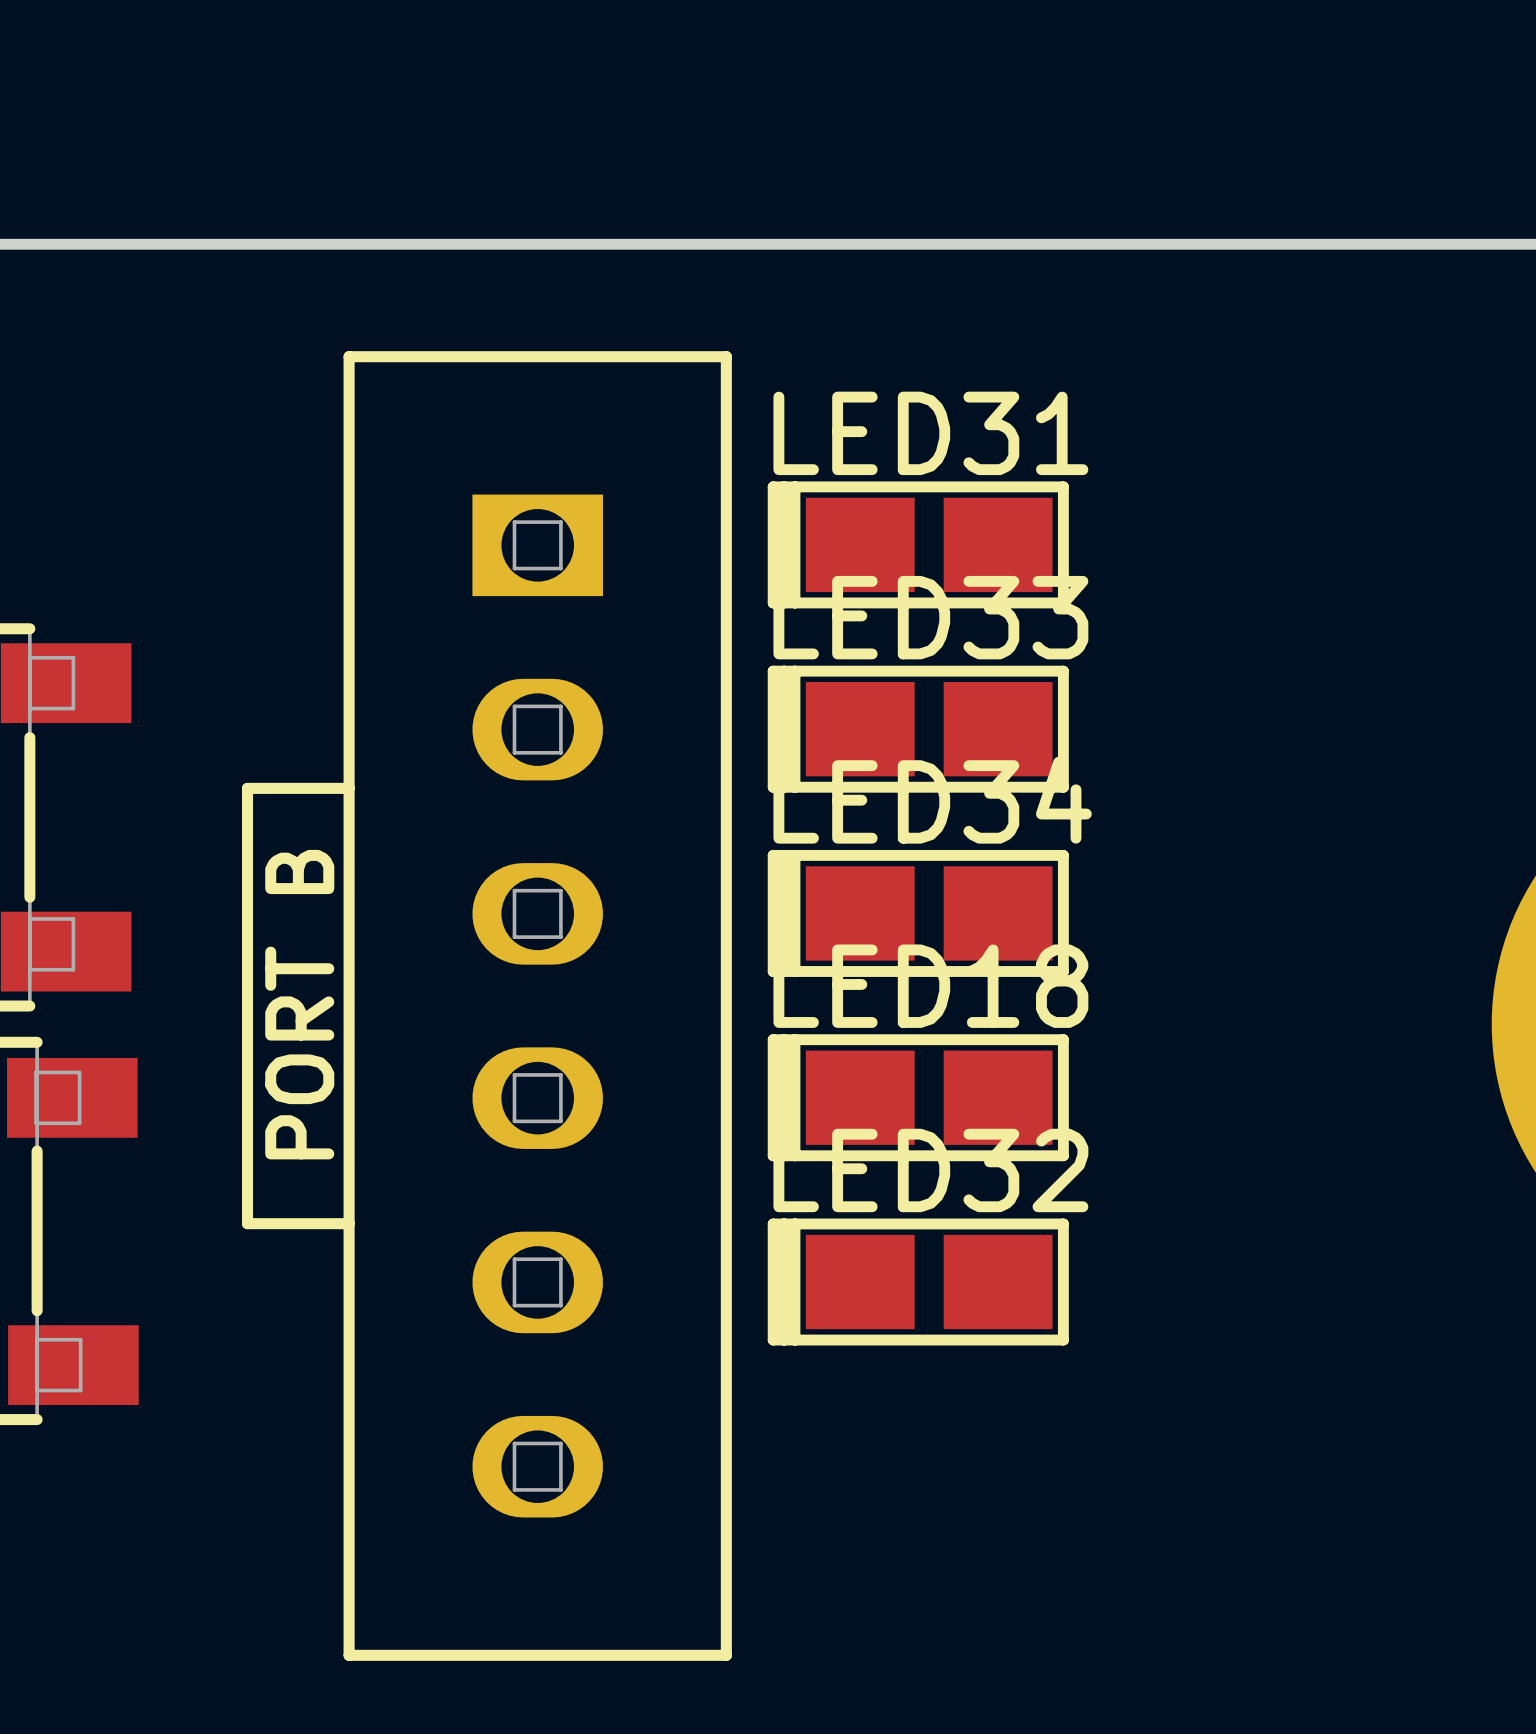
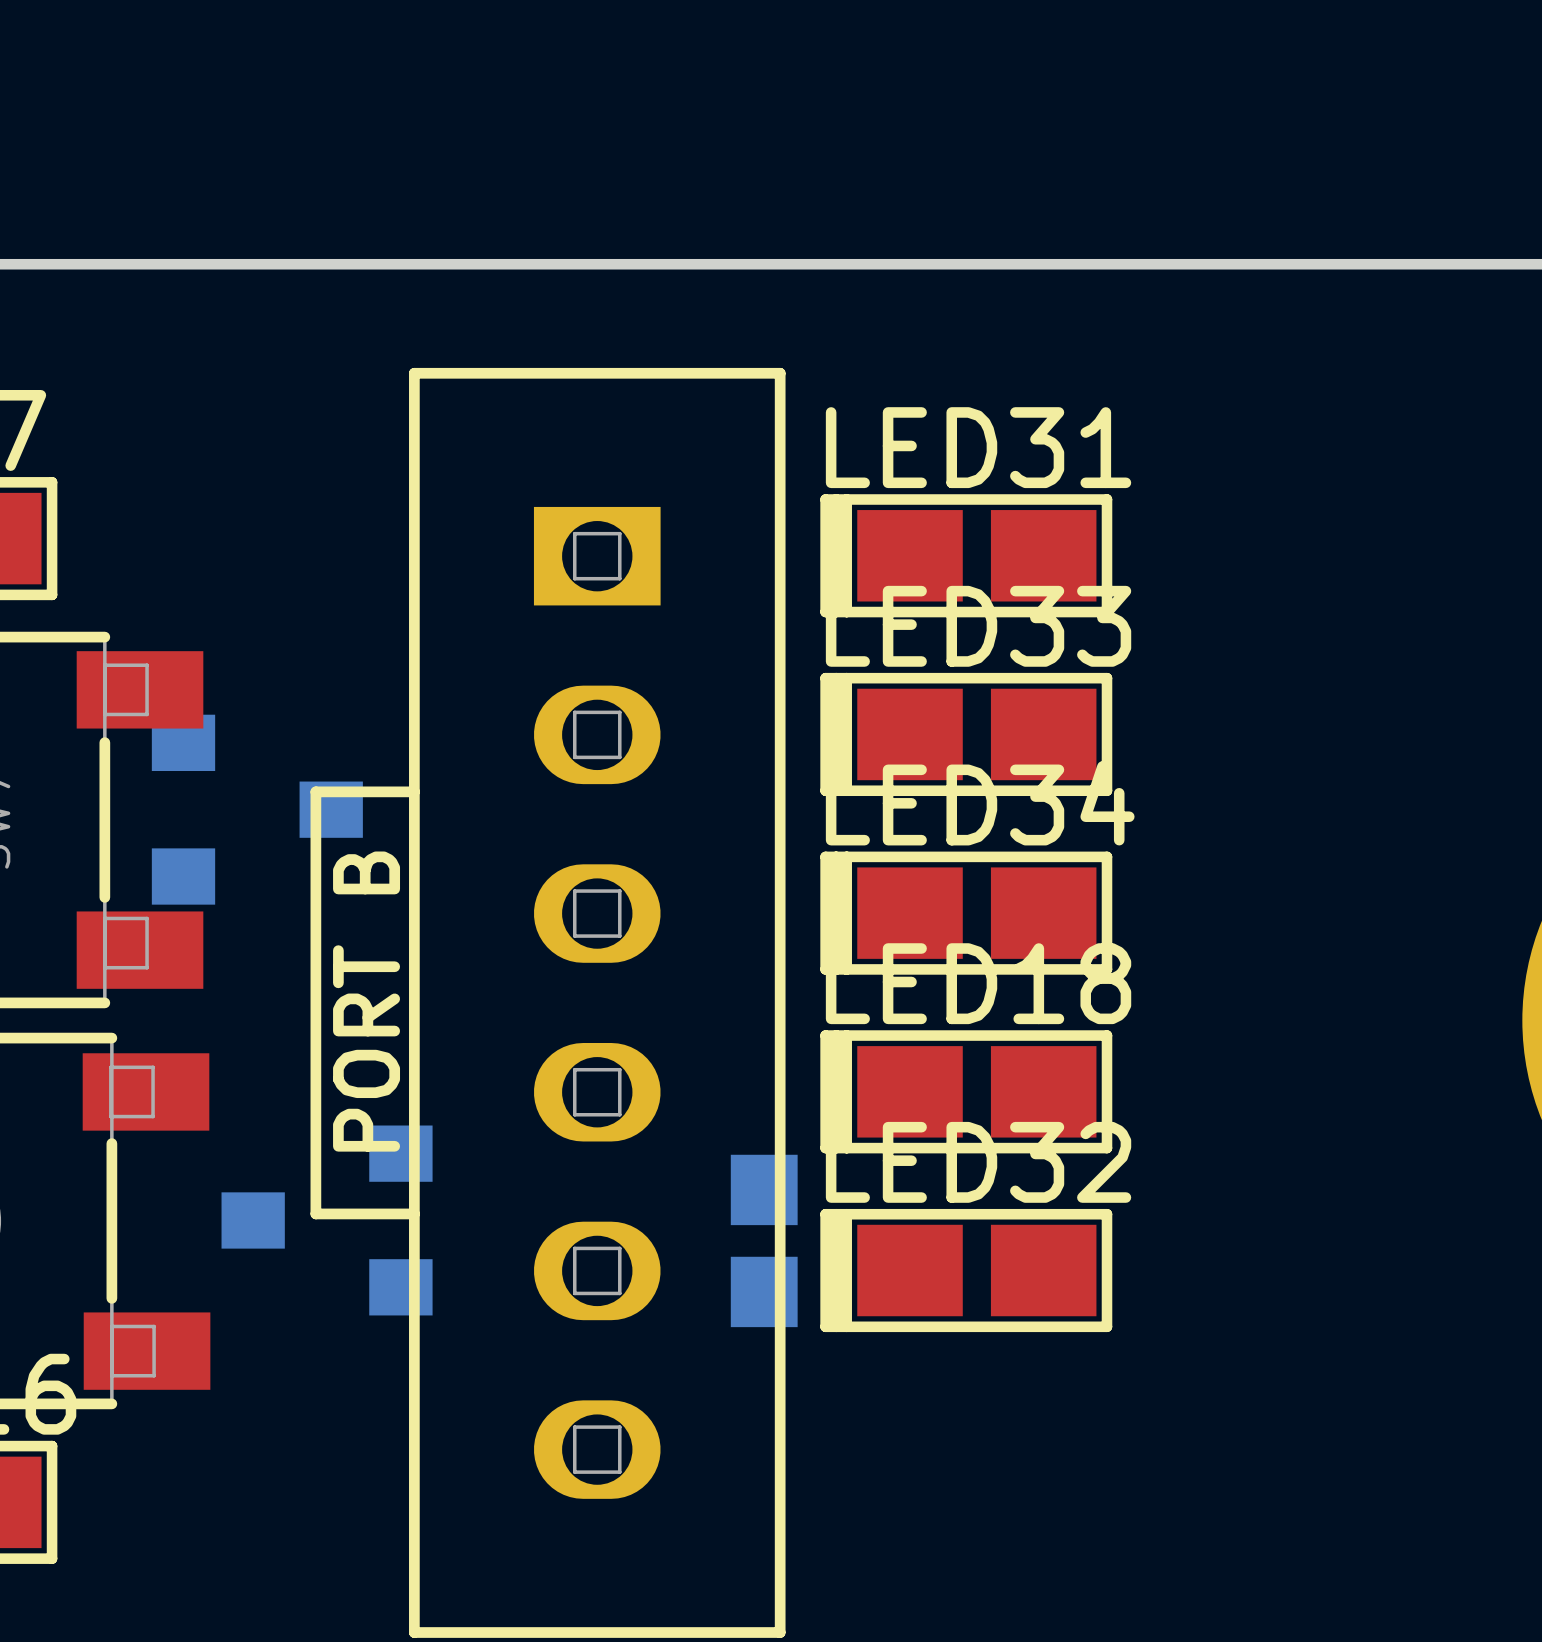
part: none -> (257, 809)
part: none -> (327, 1220)
part: none -> (764, 1240)

